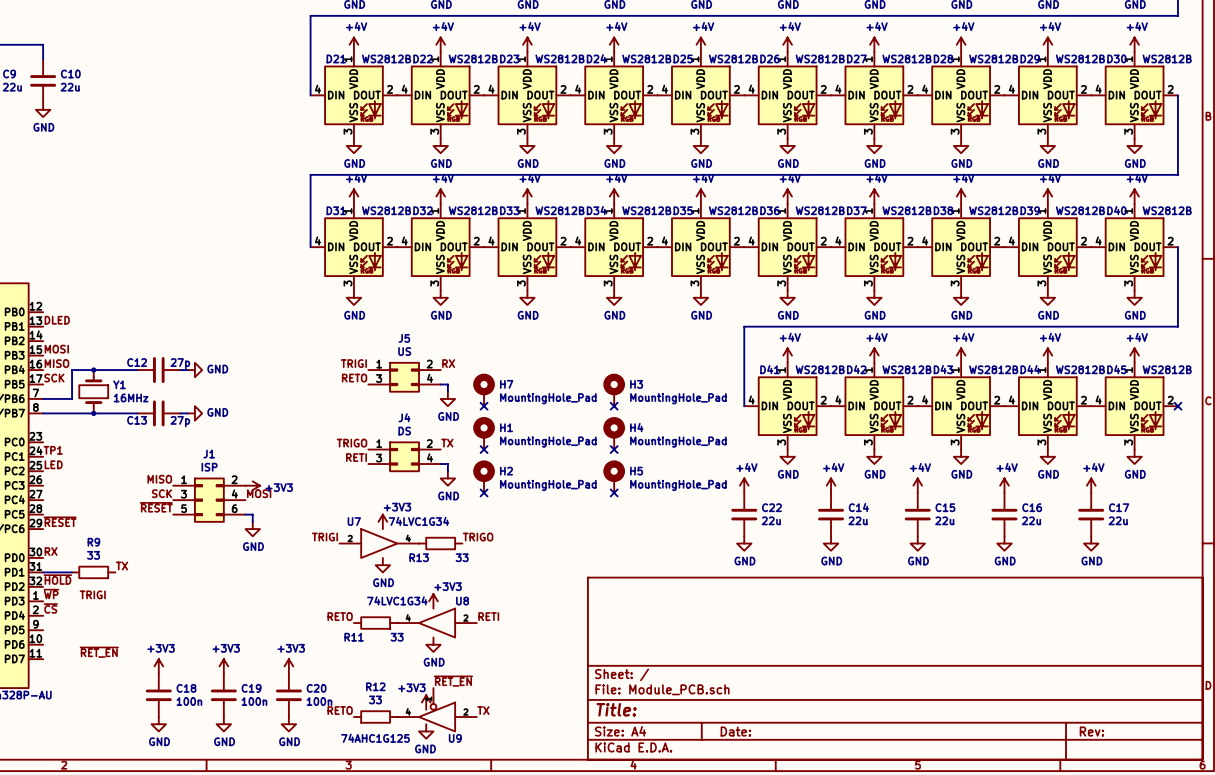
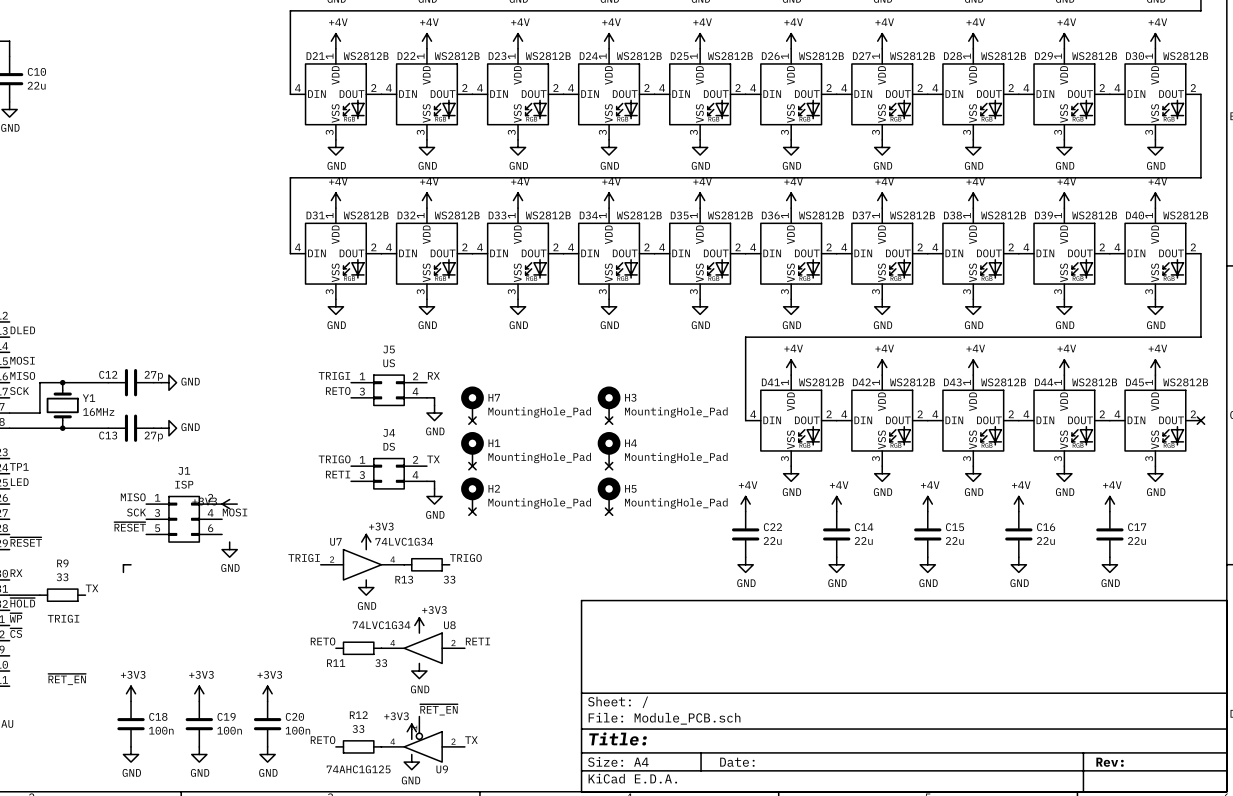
power symbol rotation: 0° (252, 485) -> 180° (229, 504)
wire: (245, 514) (252, 514) (252, 521) -> none
wire: none -> (131, 564) (123, 564) (123, 572)

